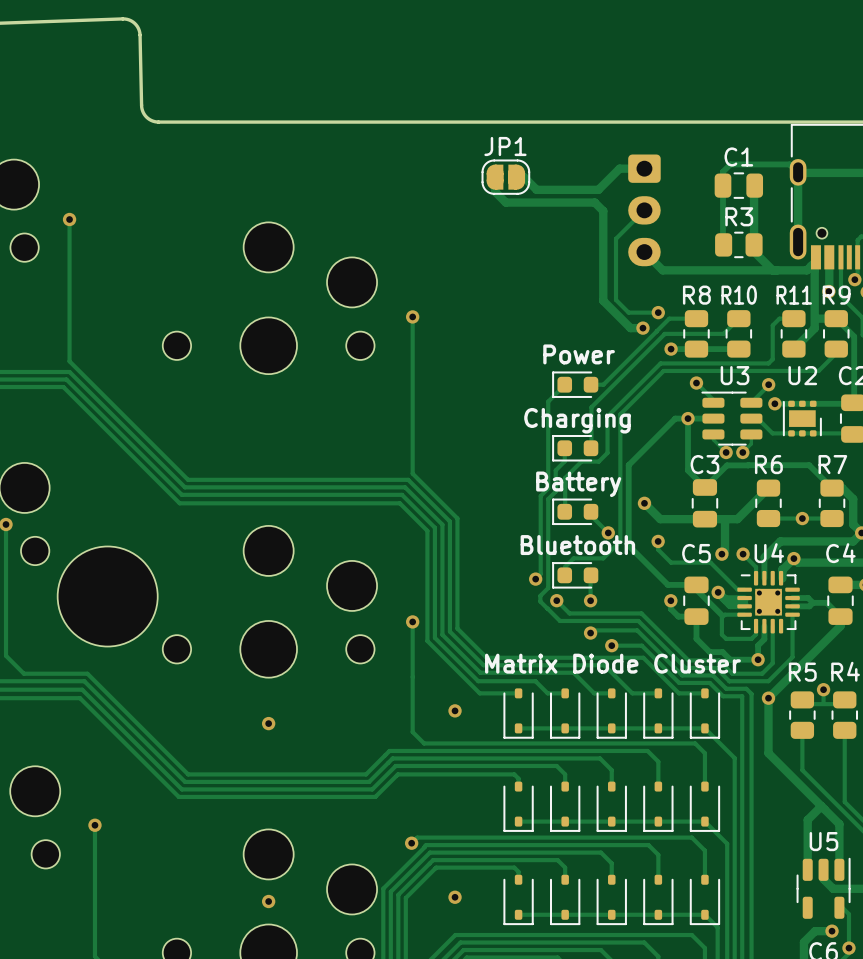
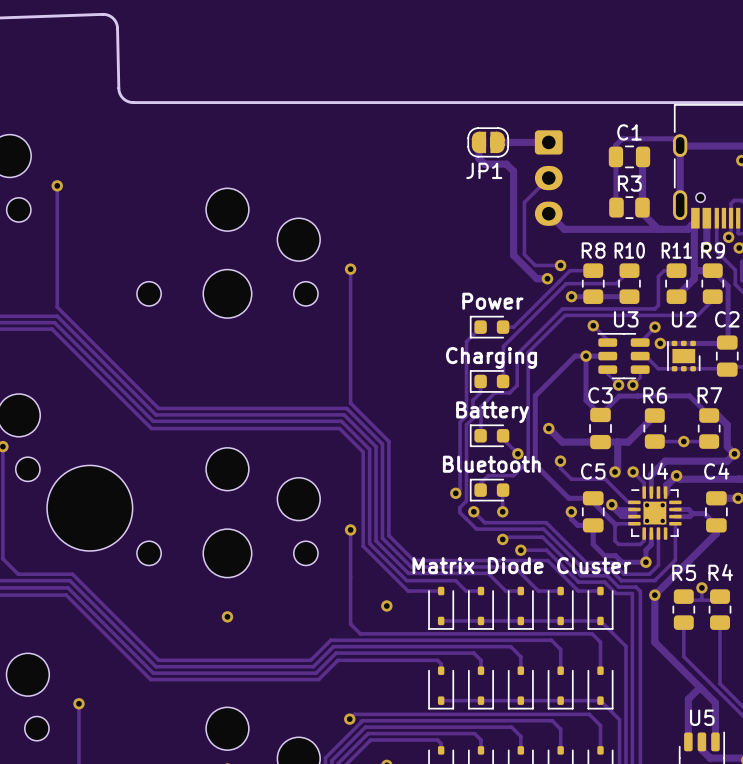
JP1 name position: JP1 (505, 146) -> JP1 (484, 170)
track: (495, 168) (495, 191) (505, 202) (594, 202) (603, 211) -> (478, 142) (478, 158) (484, 164) (506, 164) (513, 171) (513, 178)
track: (619, 168) (598, 189) (536, 189) (523, 177) (516, 177) -> (527, 142) (497, 142)
JP1 position: (505, 177) -> (488, 142)

